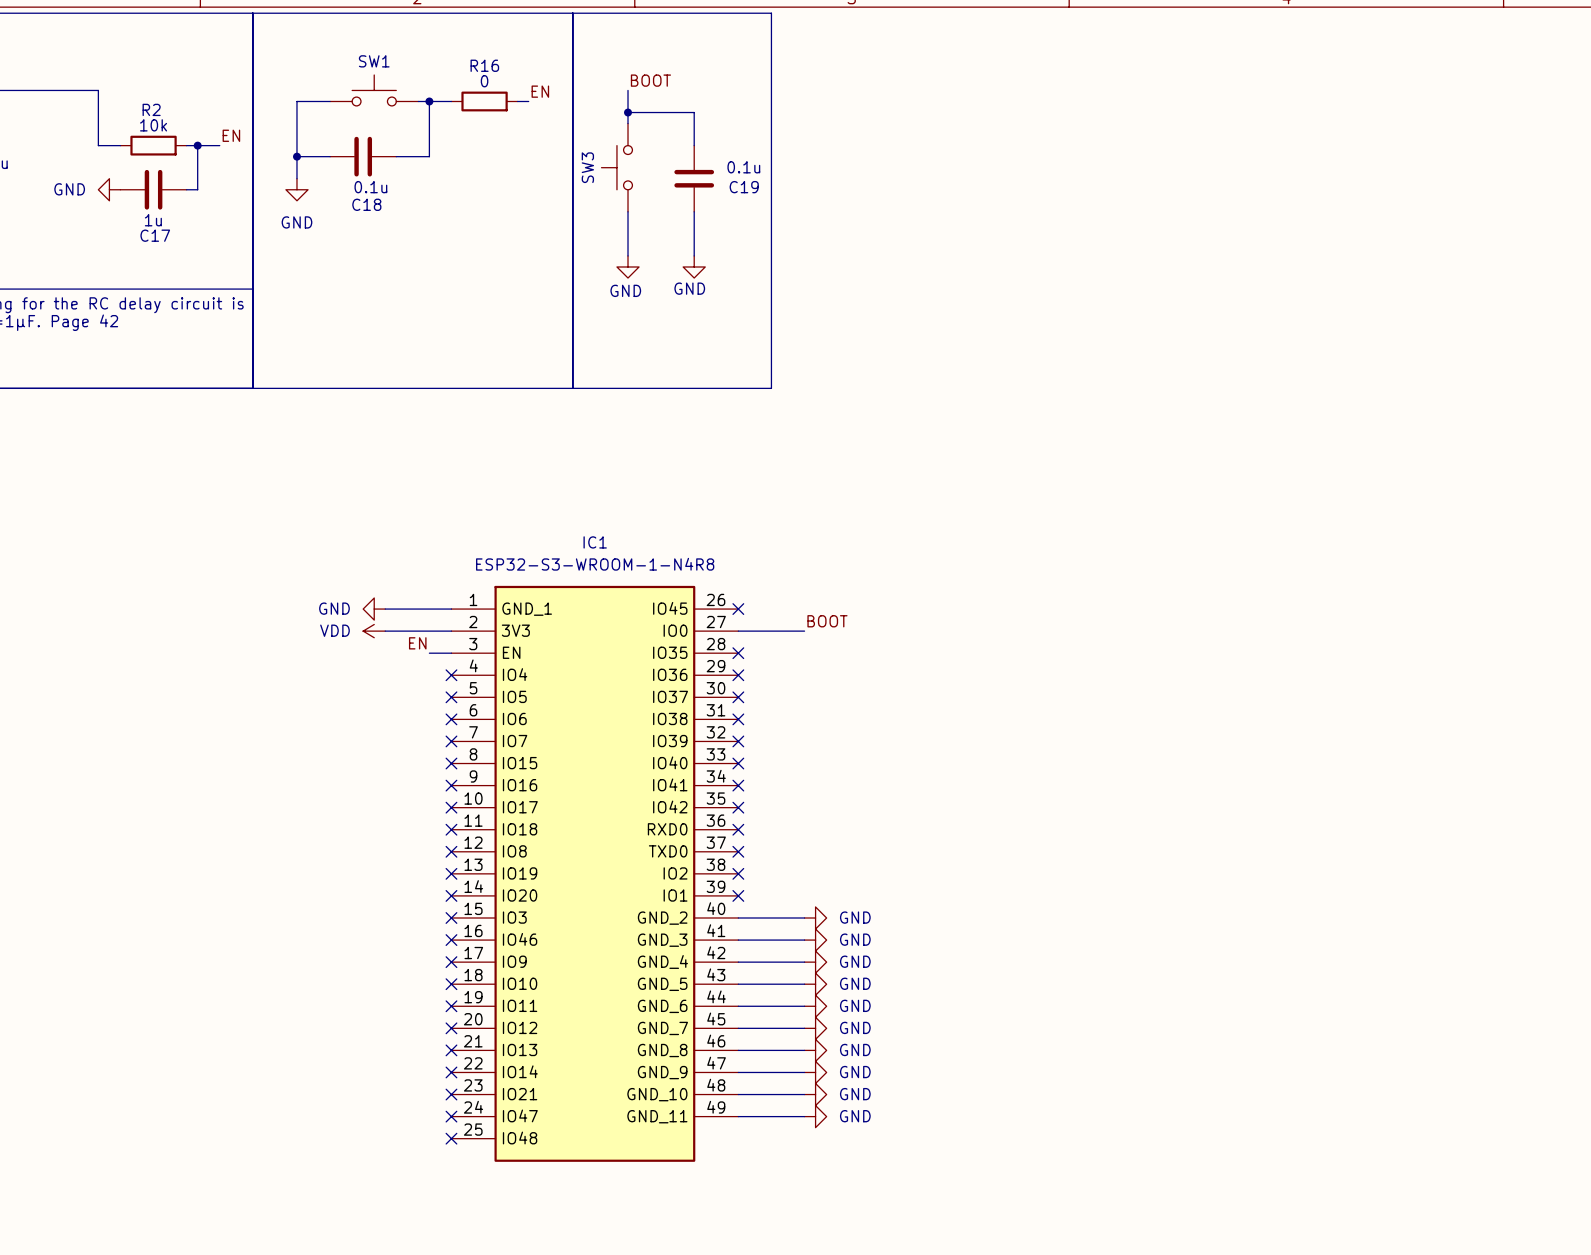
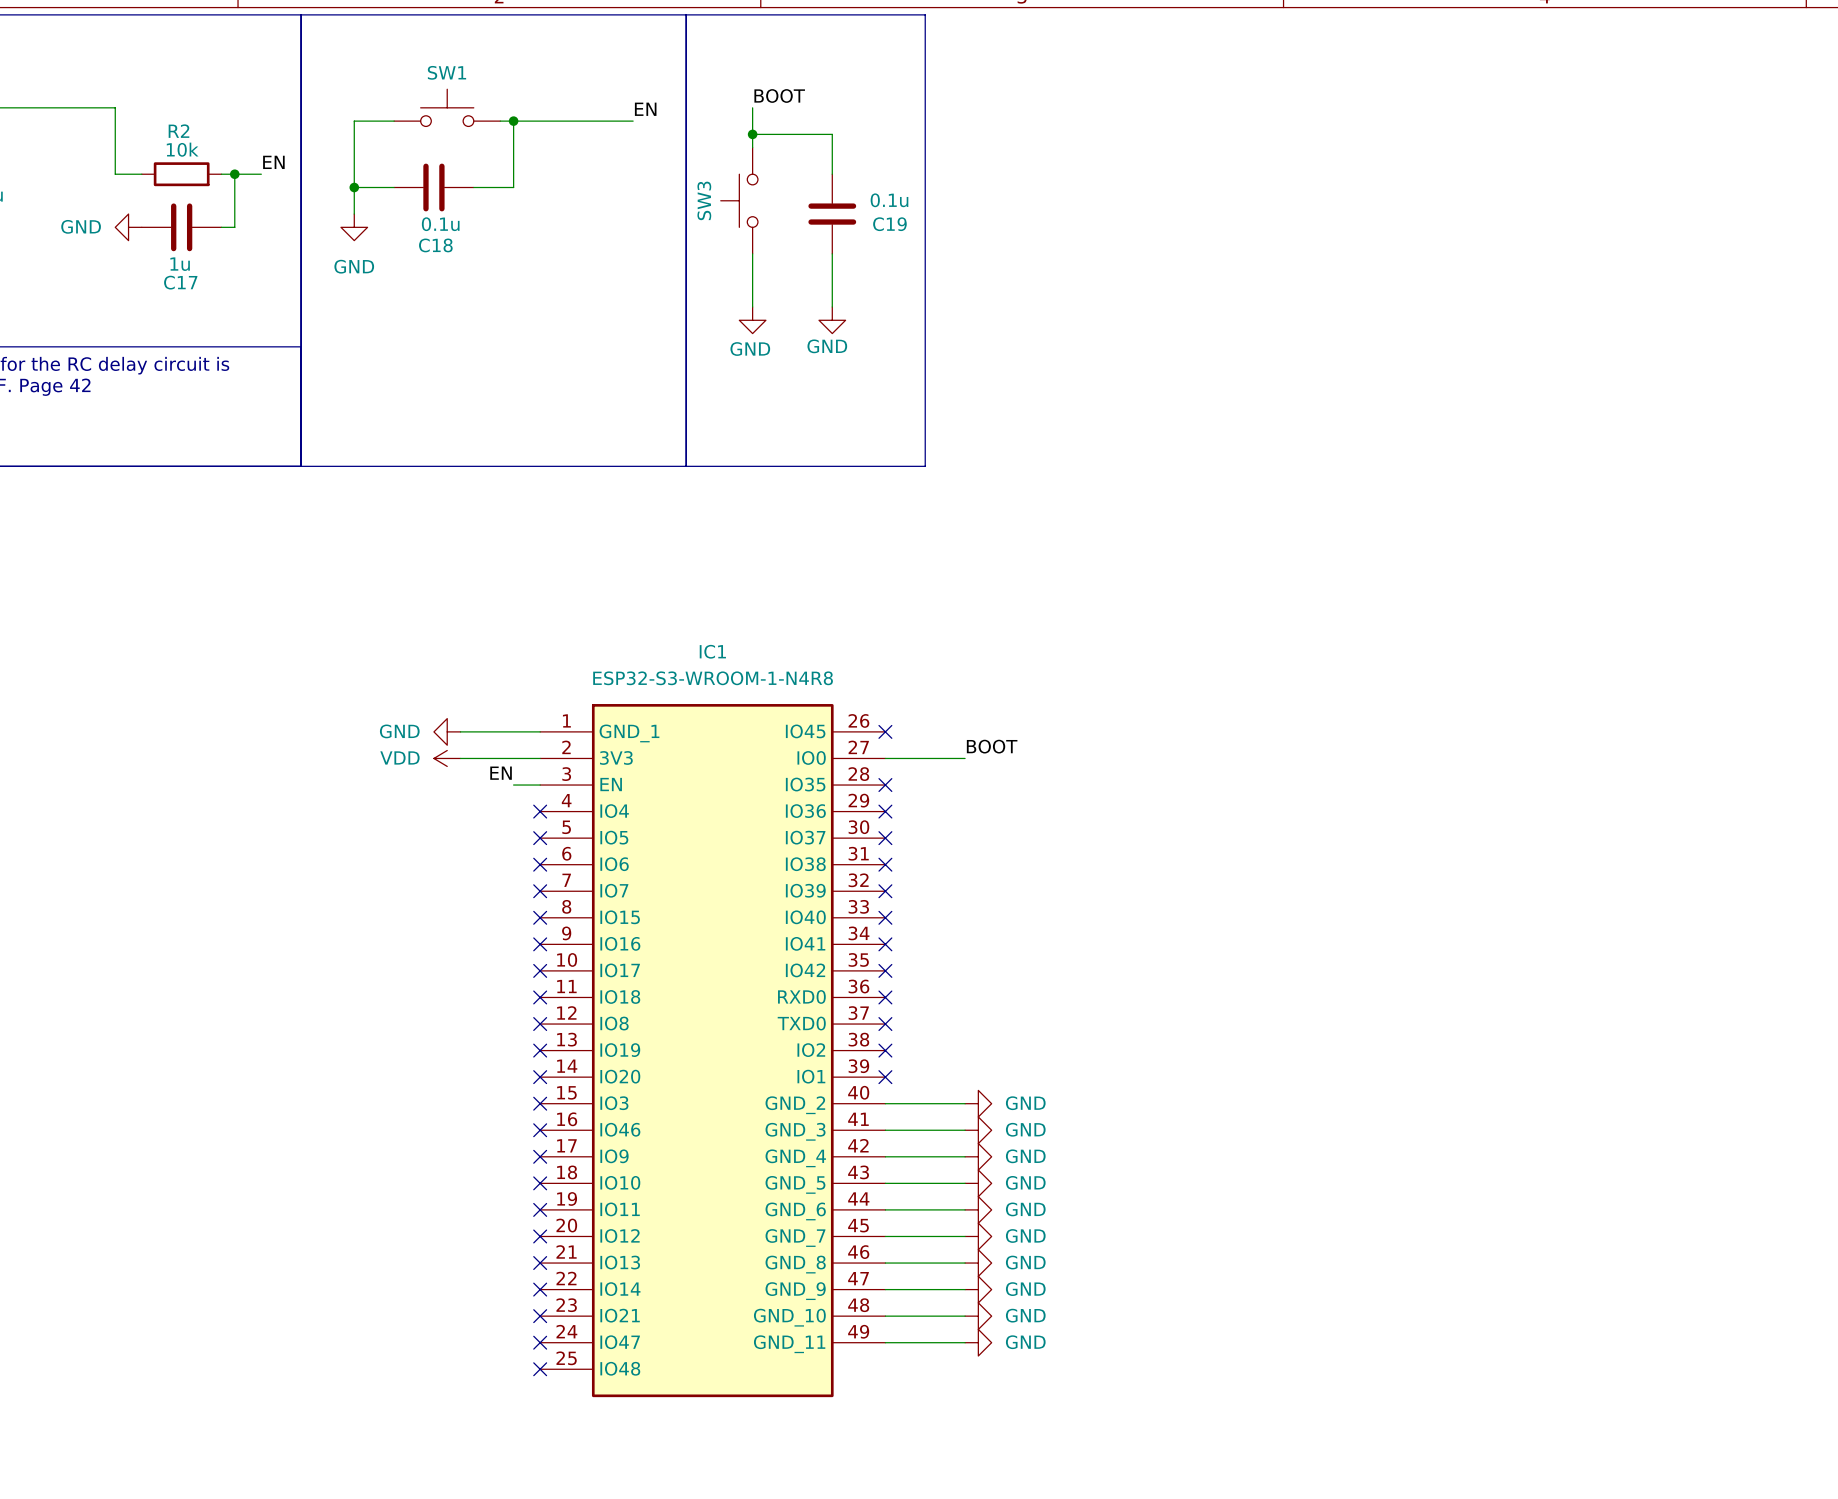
wire: none -> (540, 121) (619, 121)
R16: 0 (484, 101) -> none

